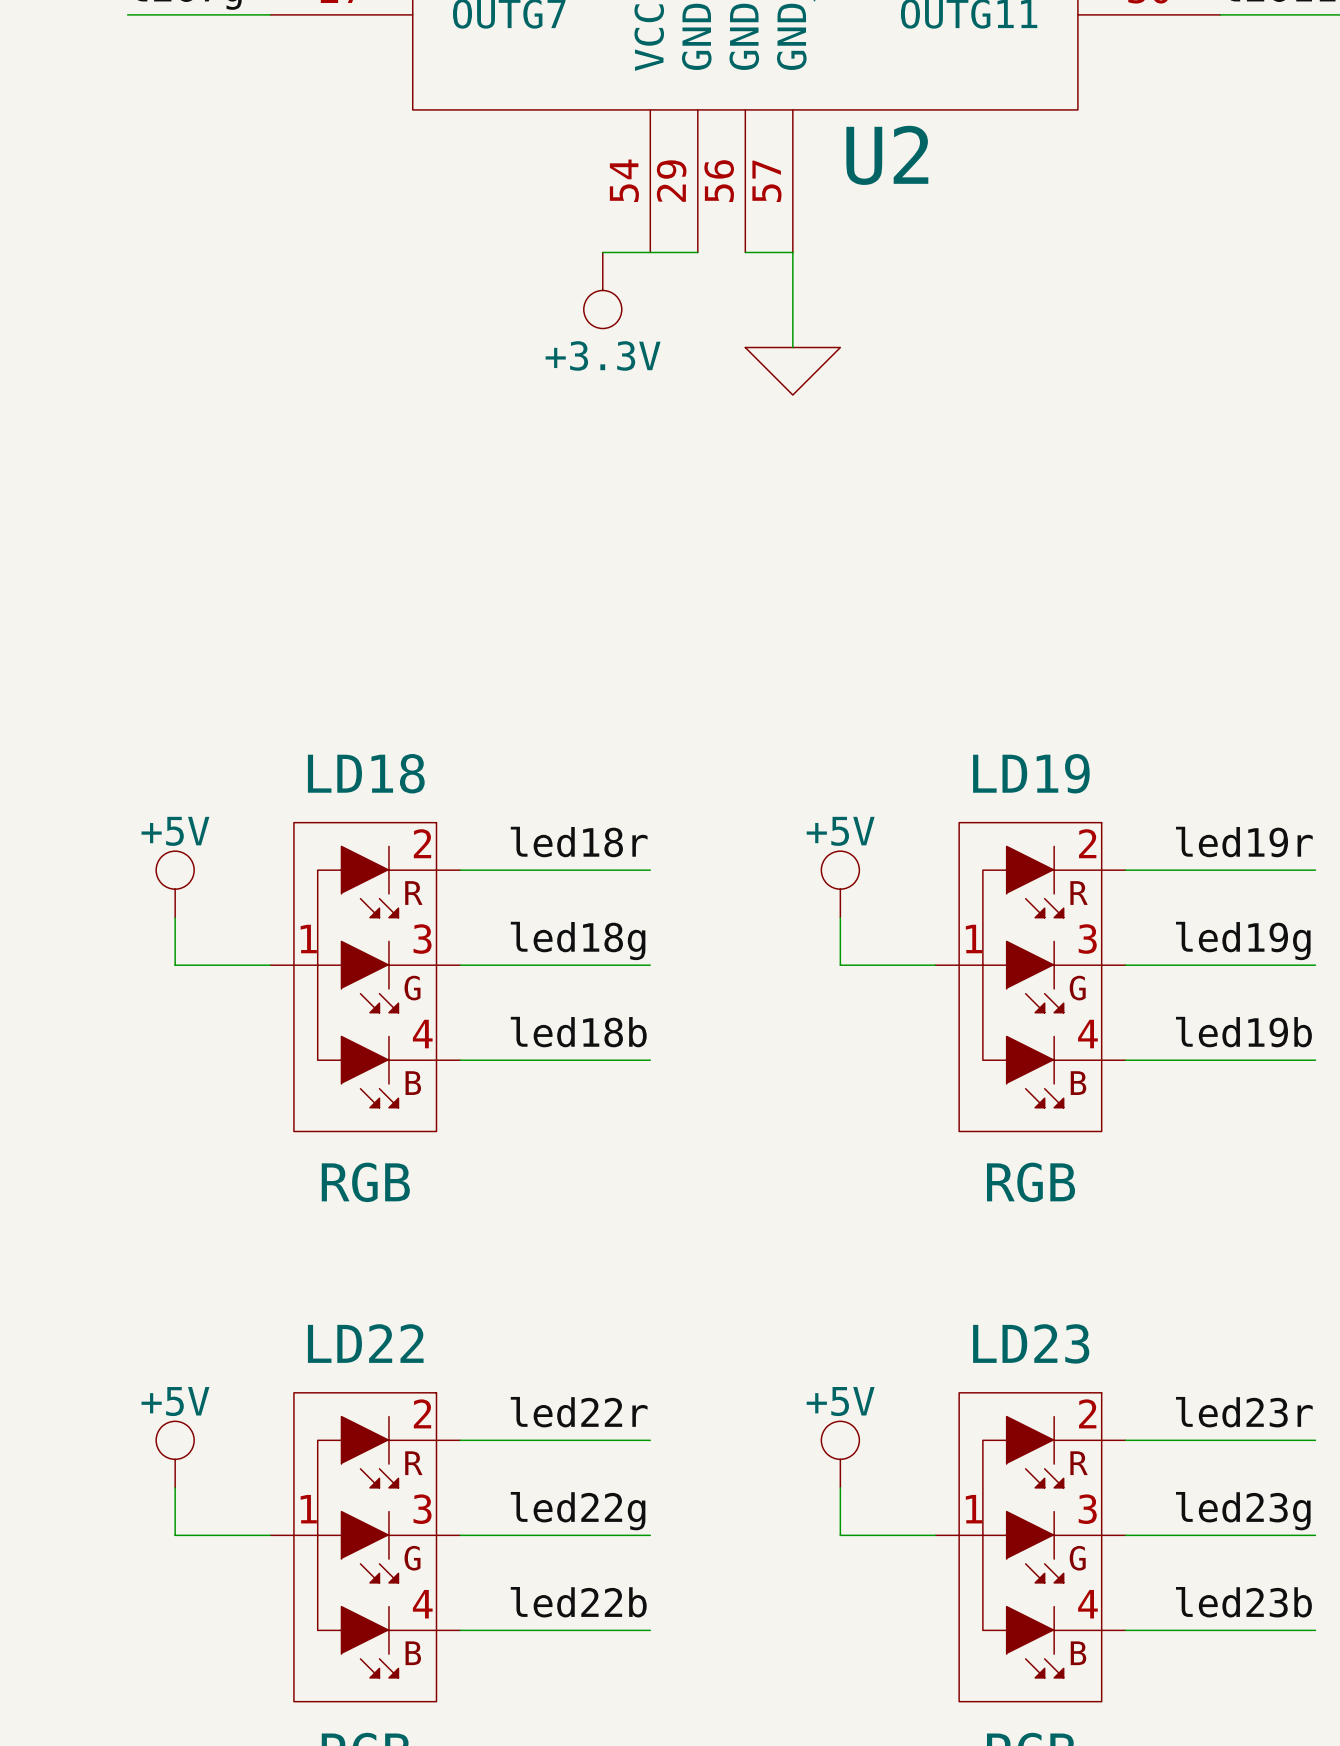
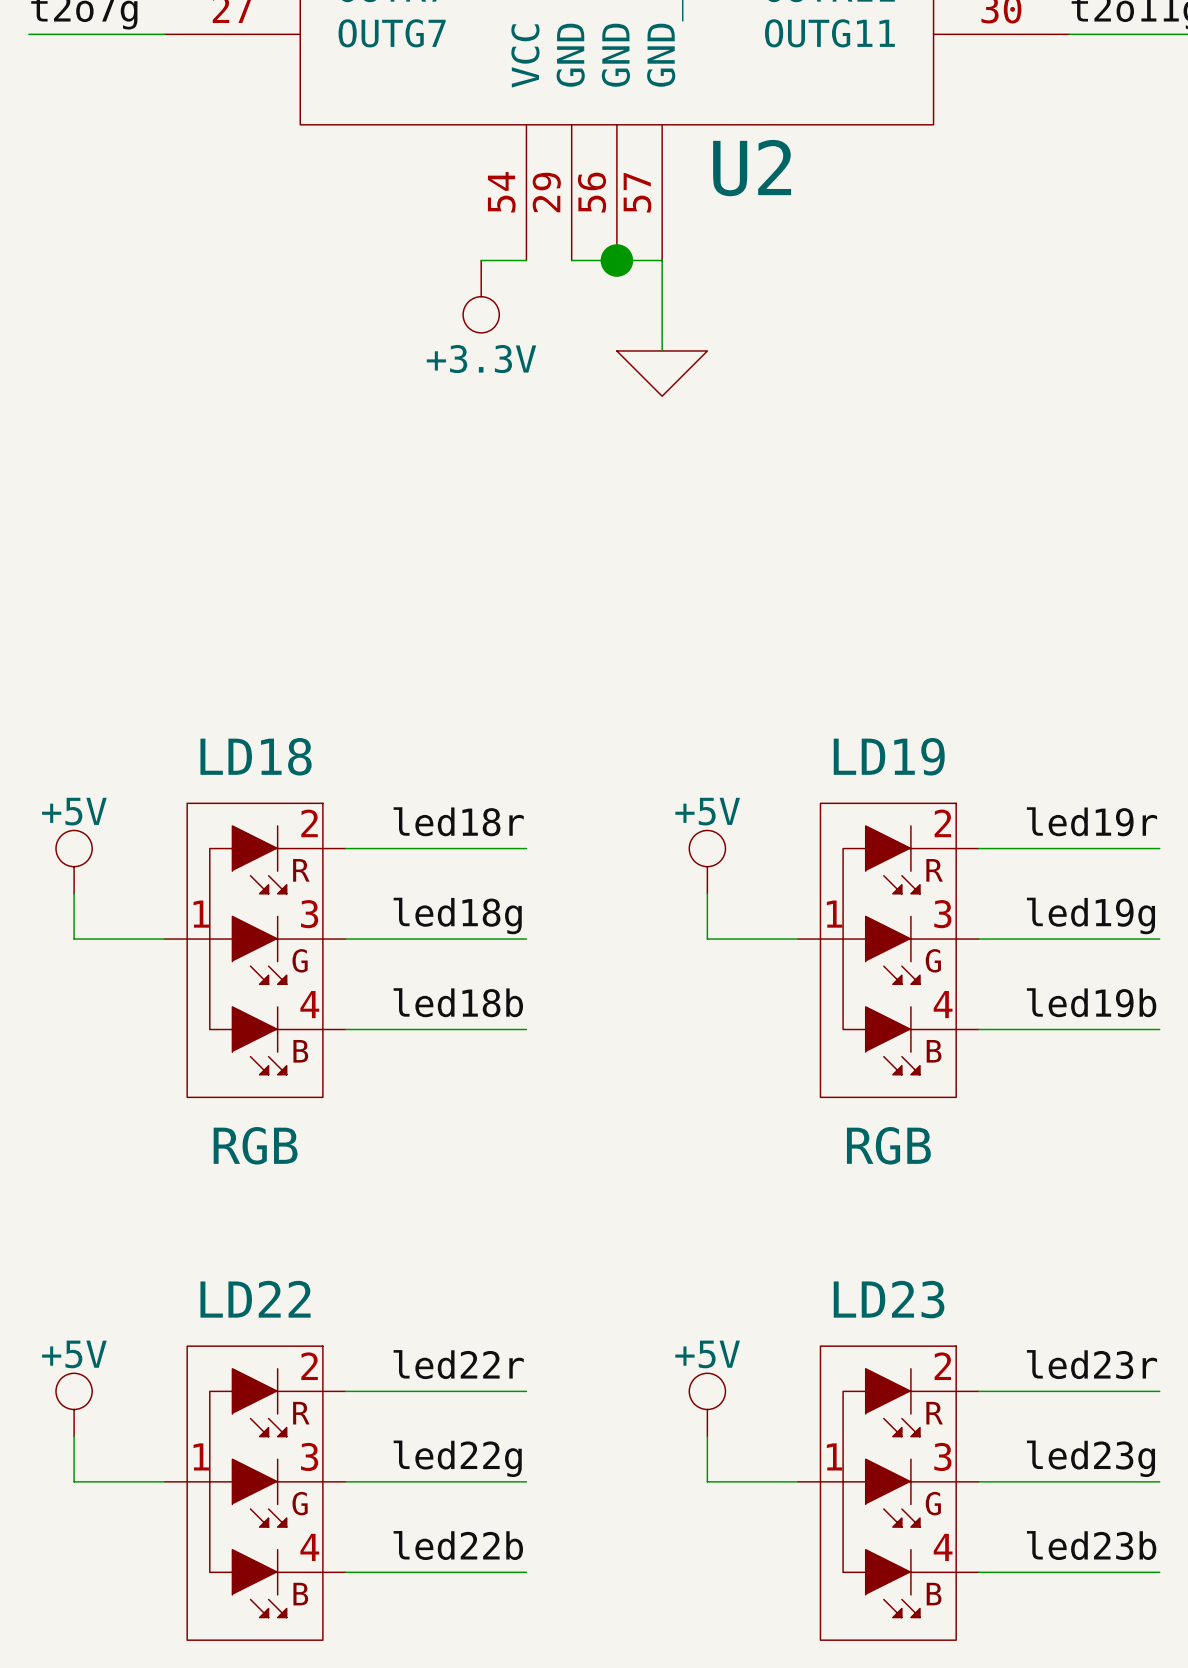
wire: (650, 252) (697, 252) -> (616, 260) (571, 260)
junction: none -> (616, 260)

